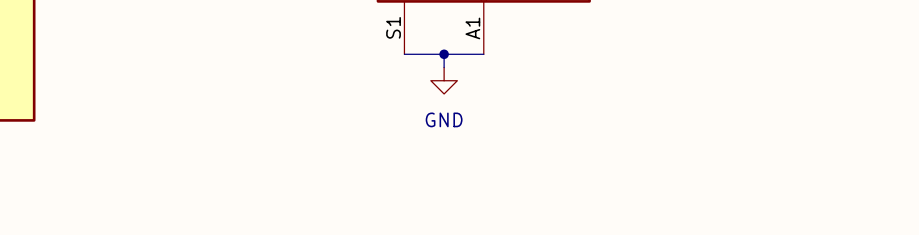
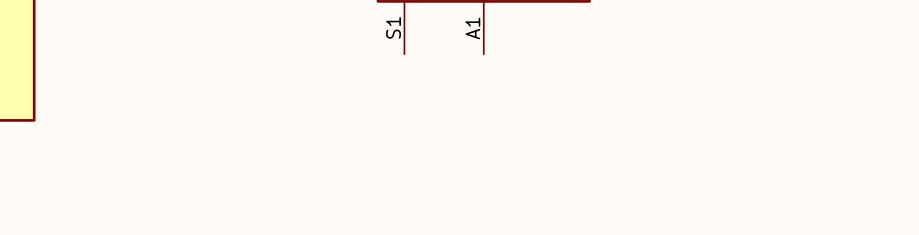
wire: (404, 54) (483, 54) -> none
wire: (444, 54) (444, 67) -> none
junction: (444, 54) -> none
power symbol: GND (444, 80) -> none

